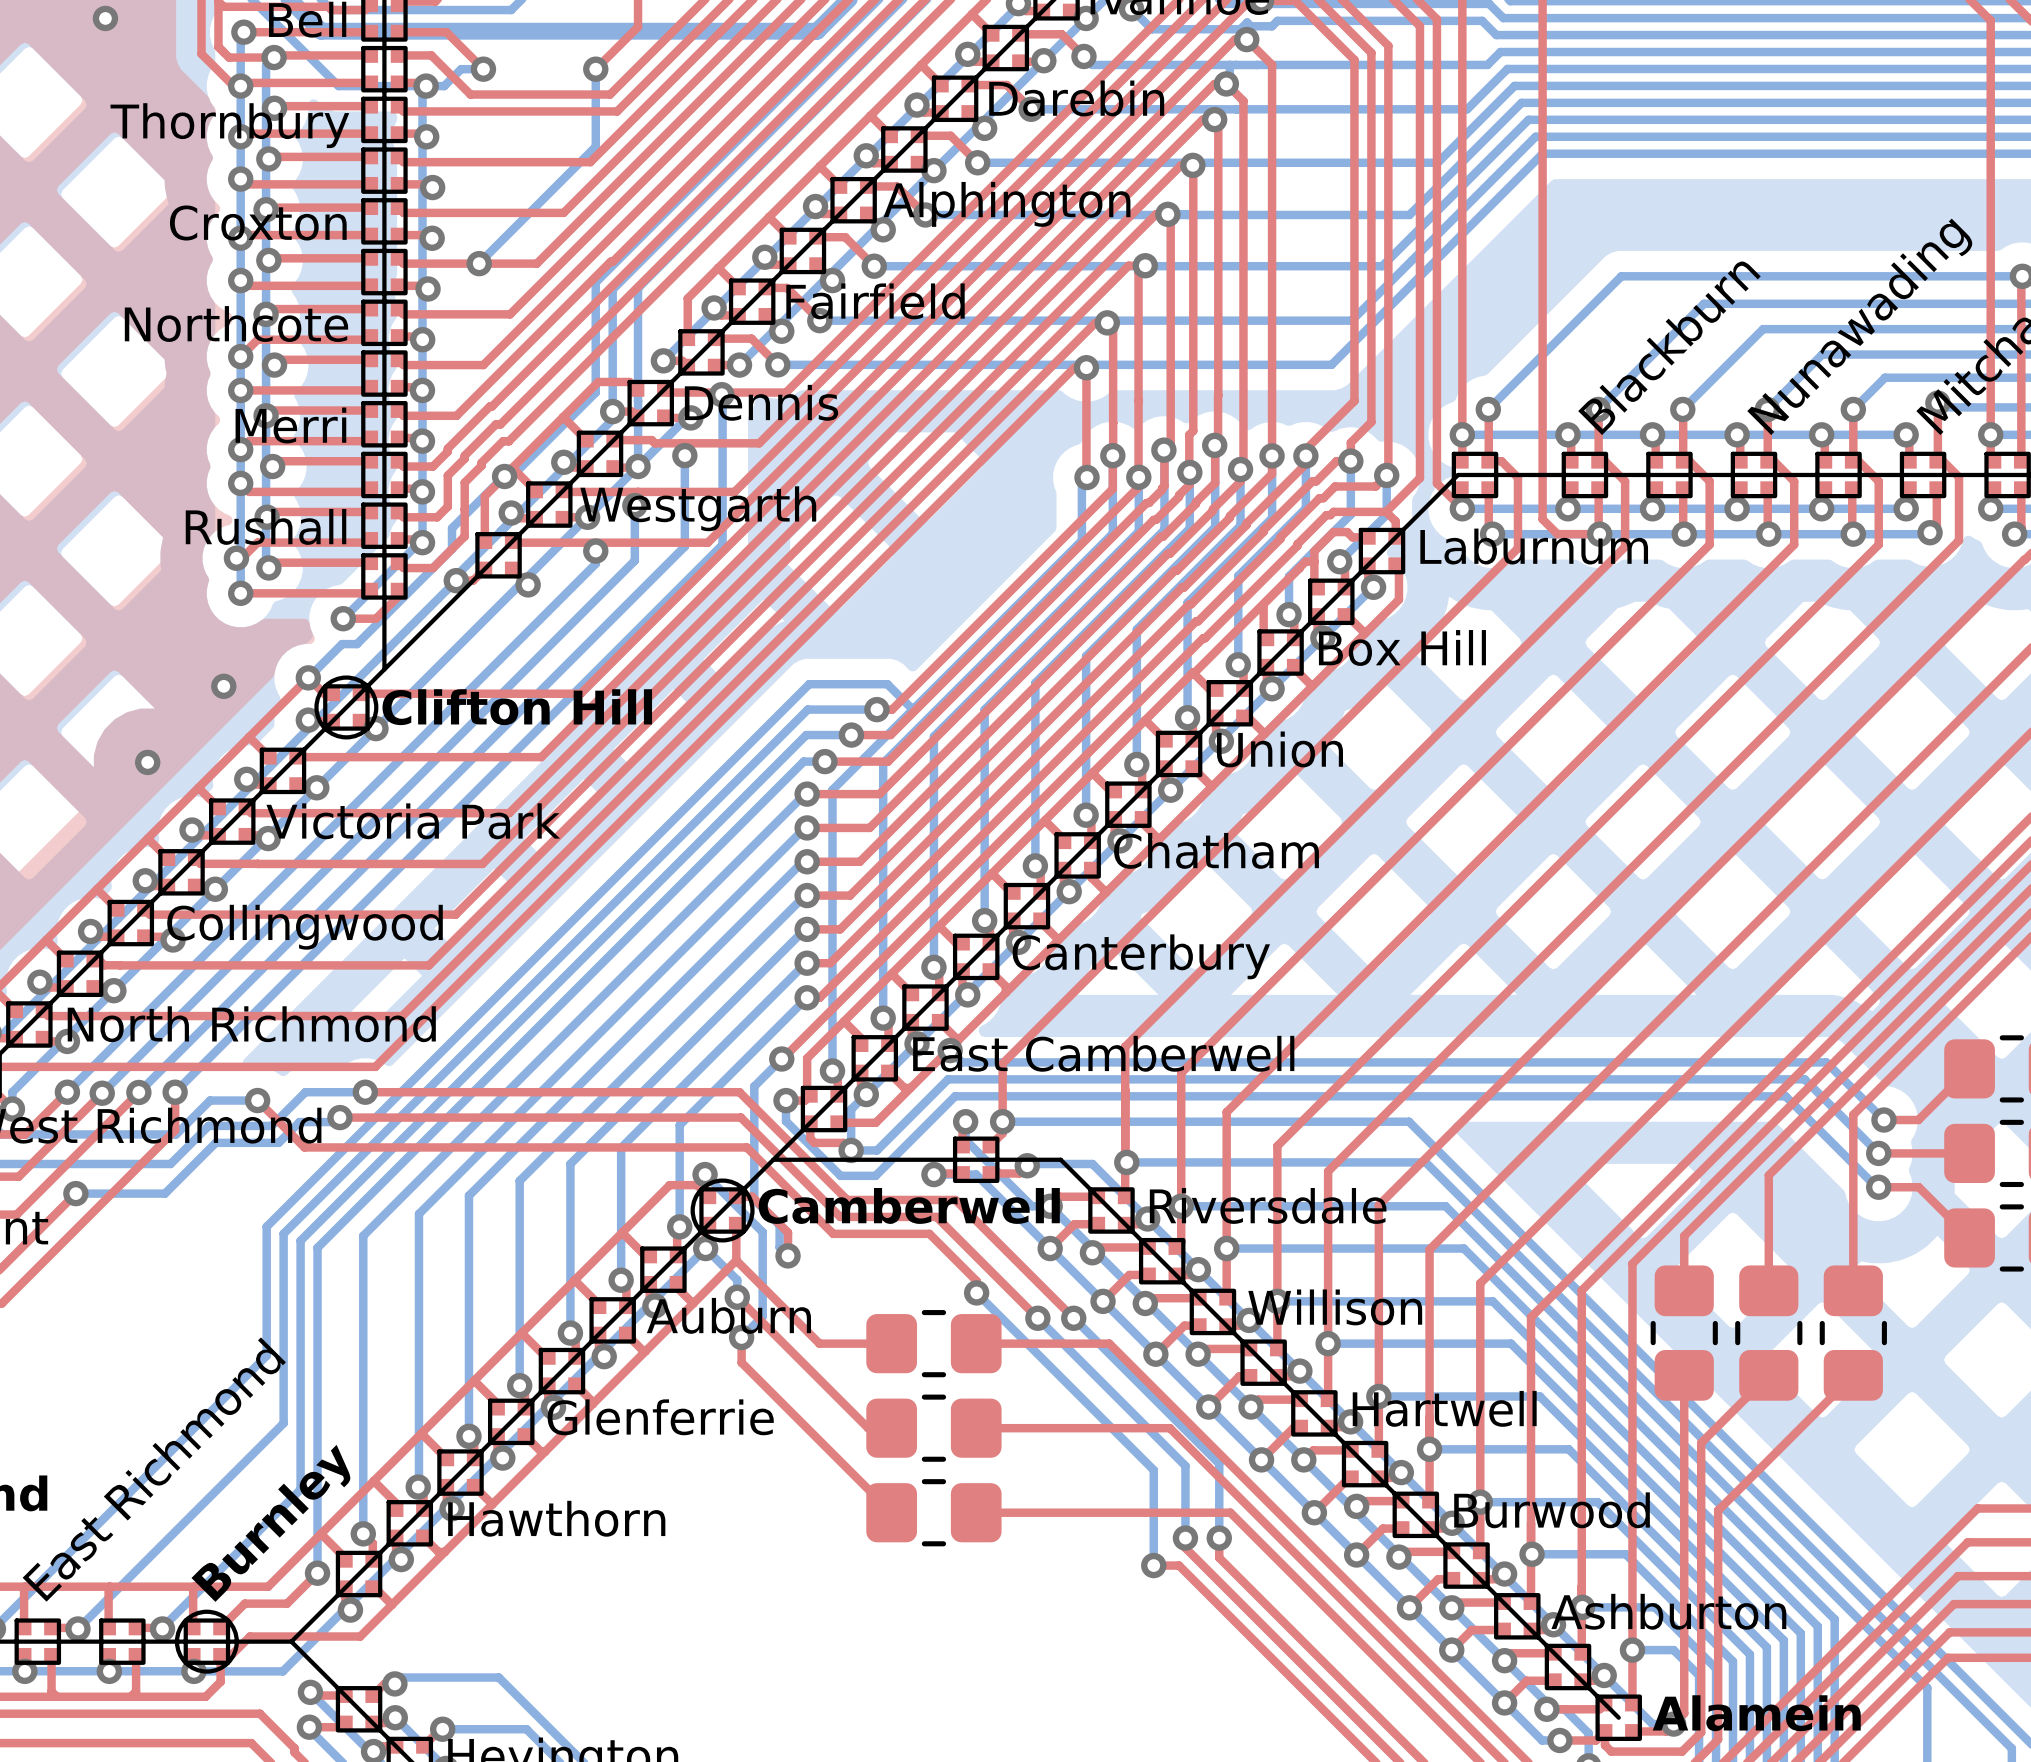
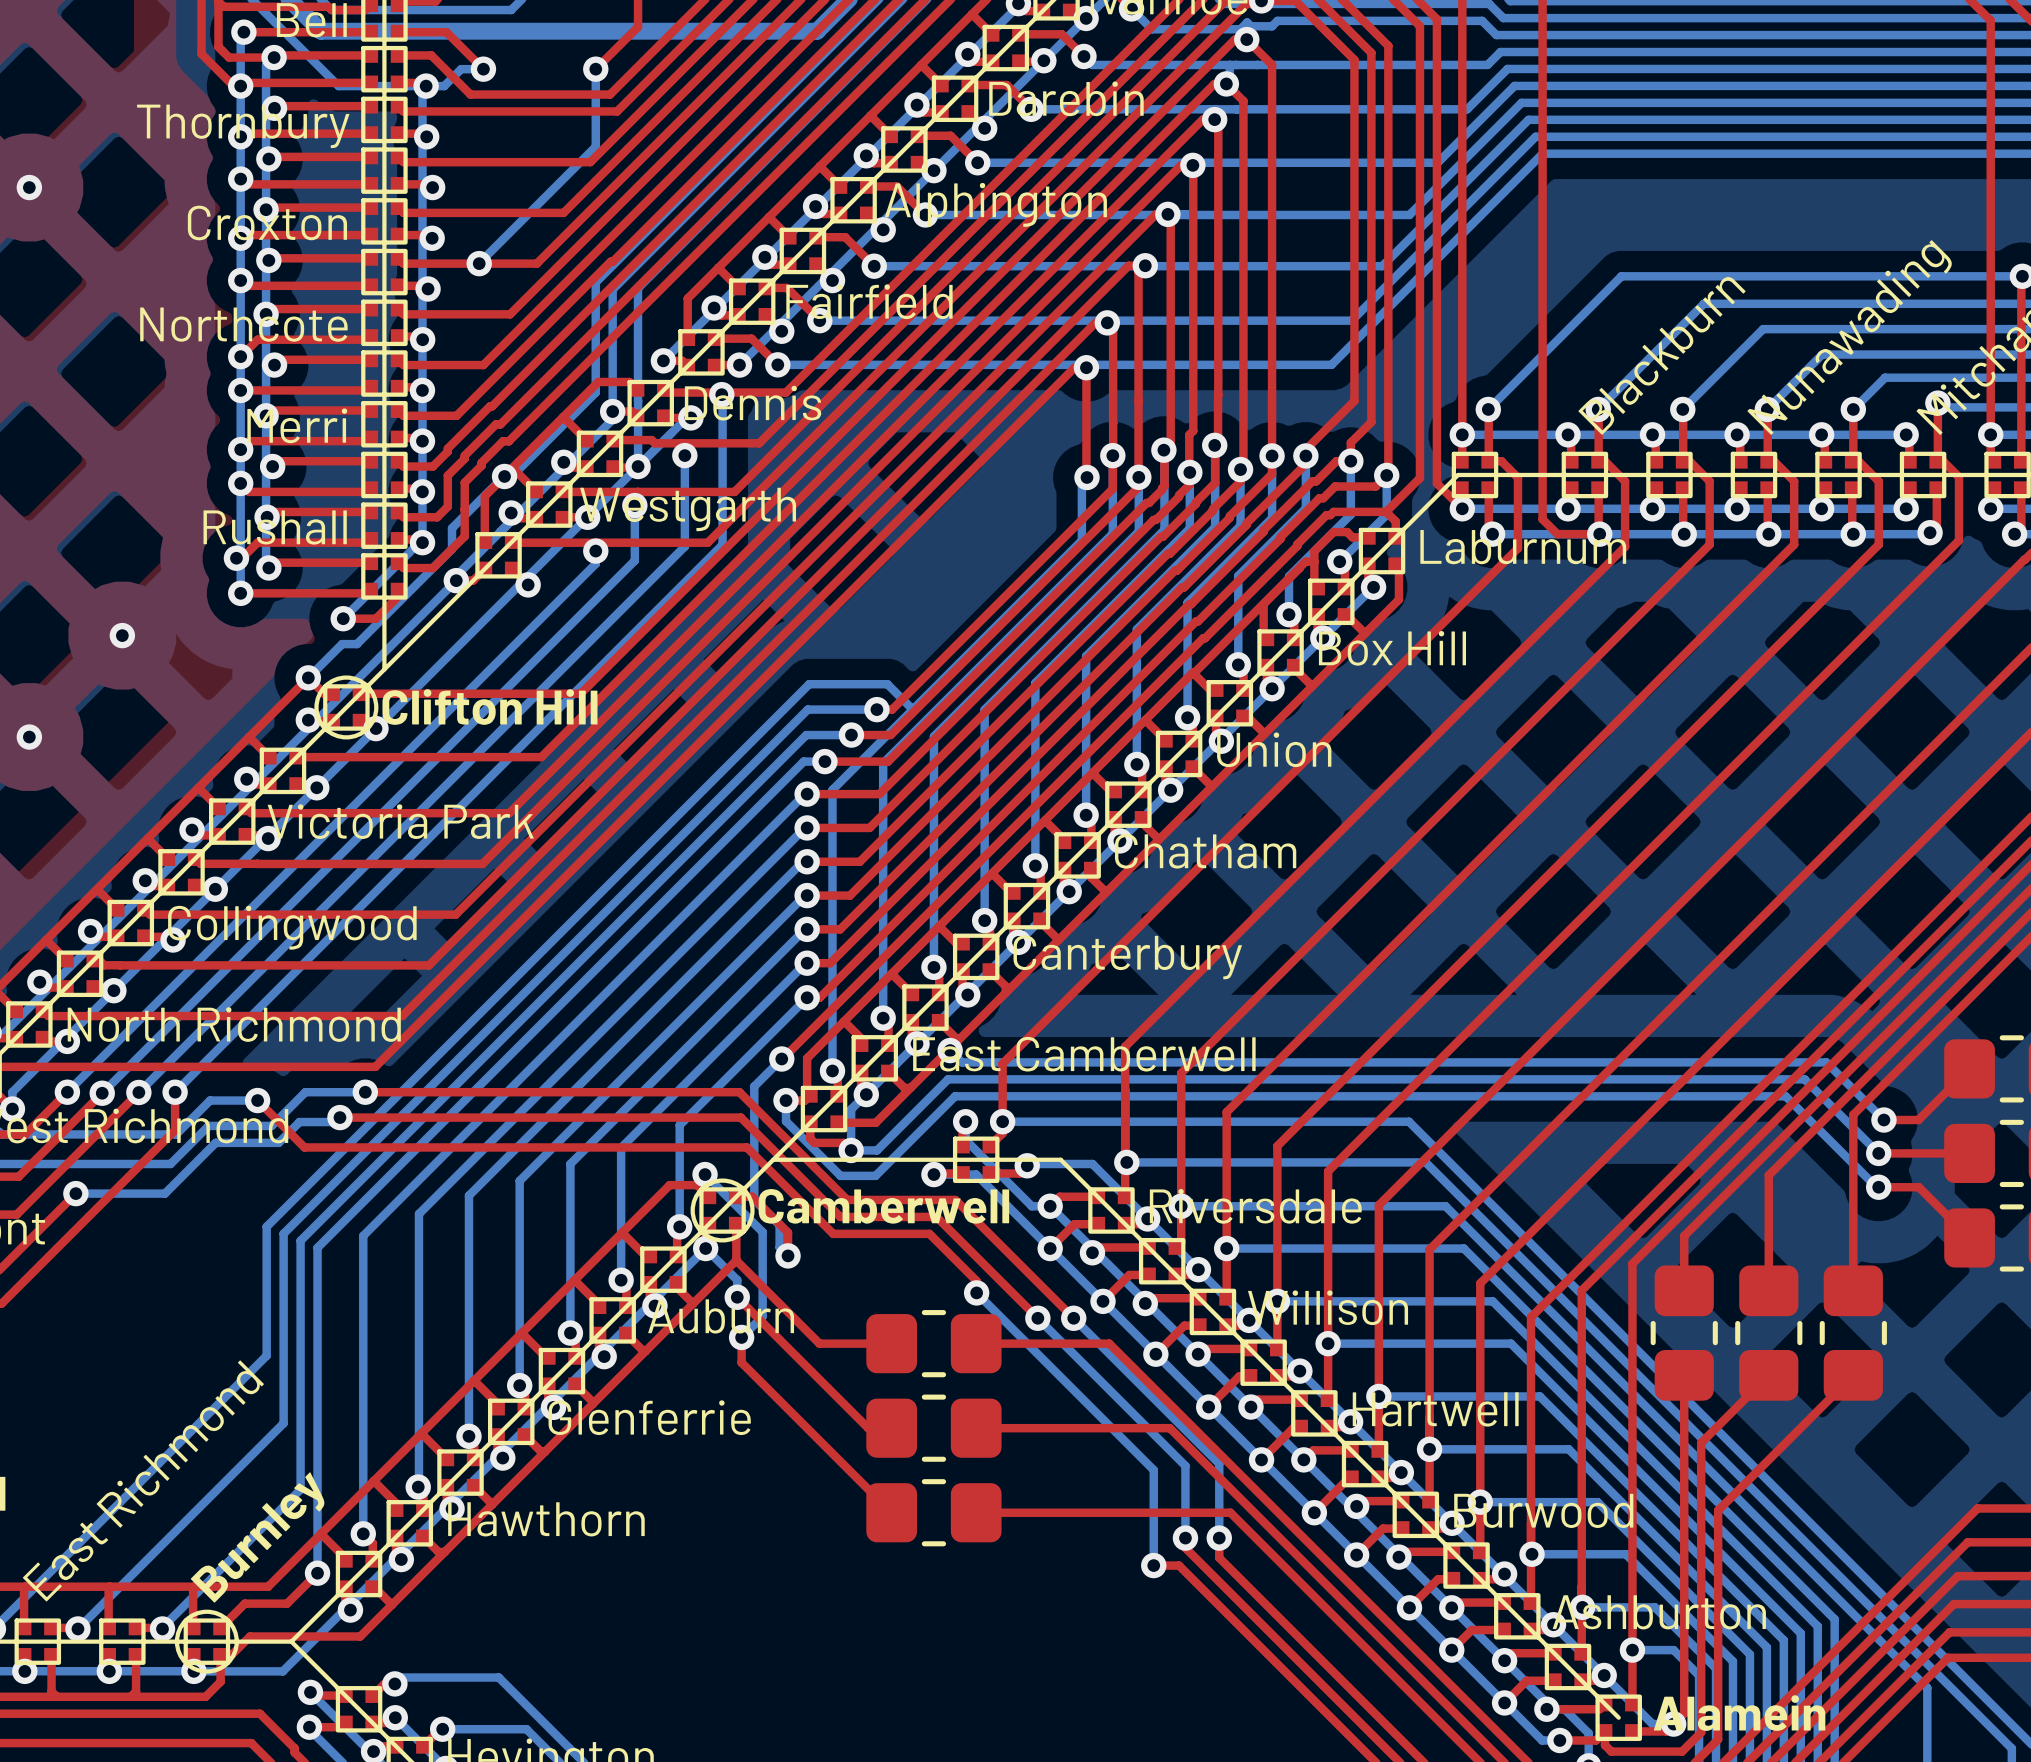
via position: (105, 18) -> (29, 187)
via: none -> (122, 635)
via: (223, 686) -> none
via: none -> (29, 737)
via: (147, 762) -> none

